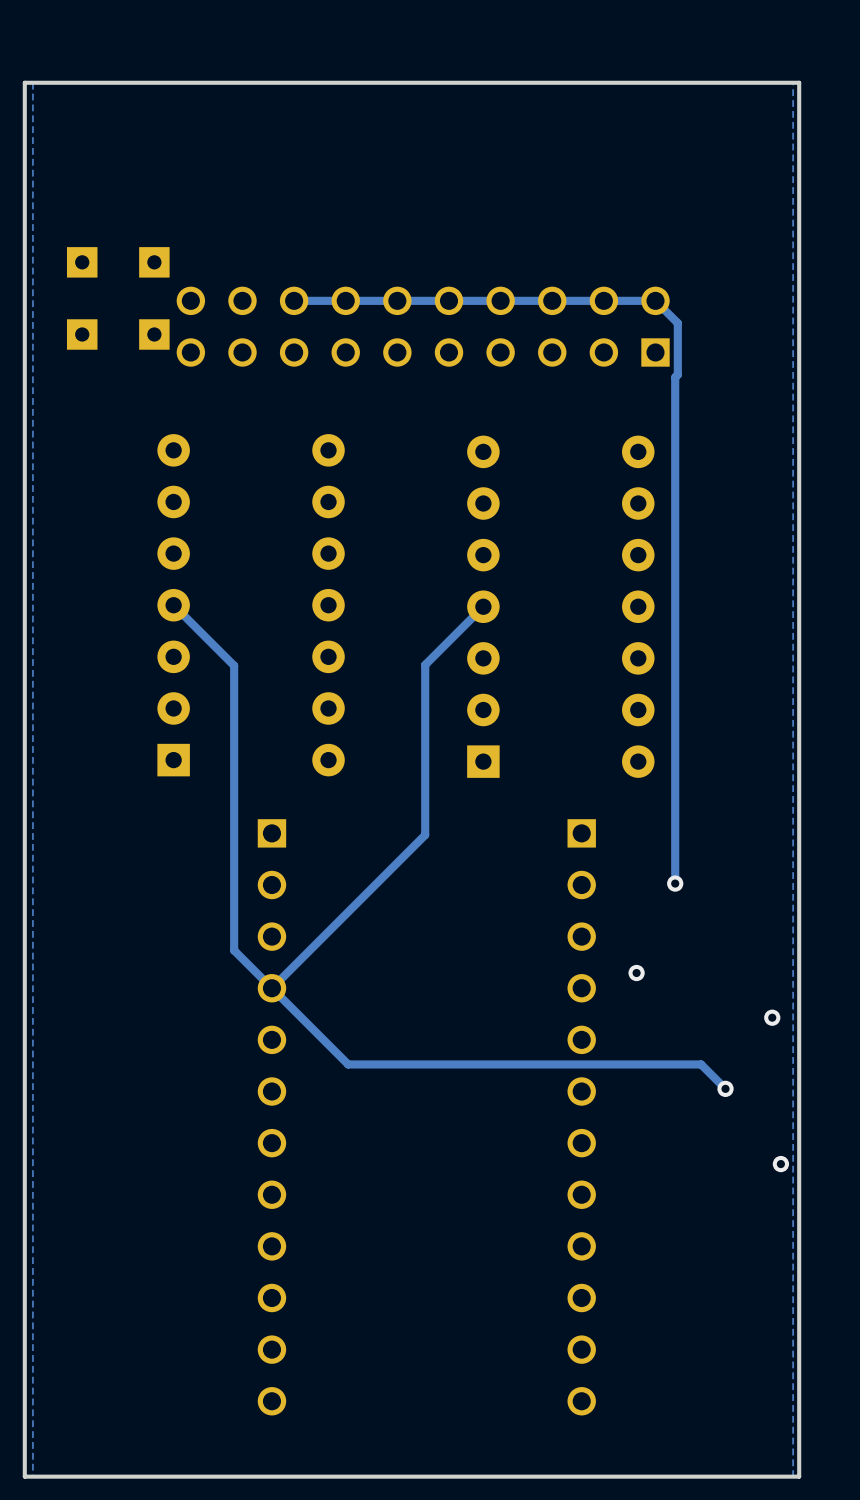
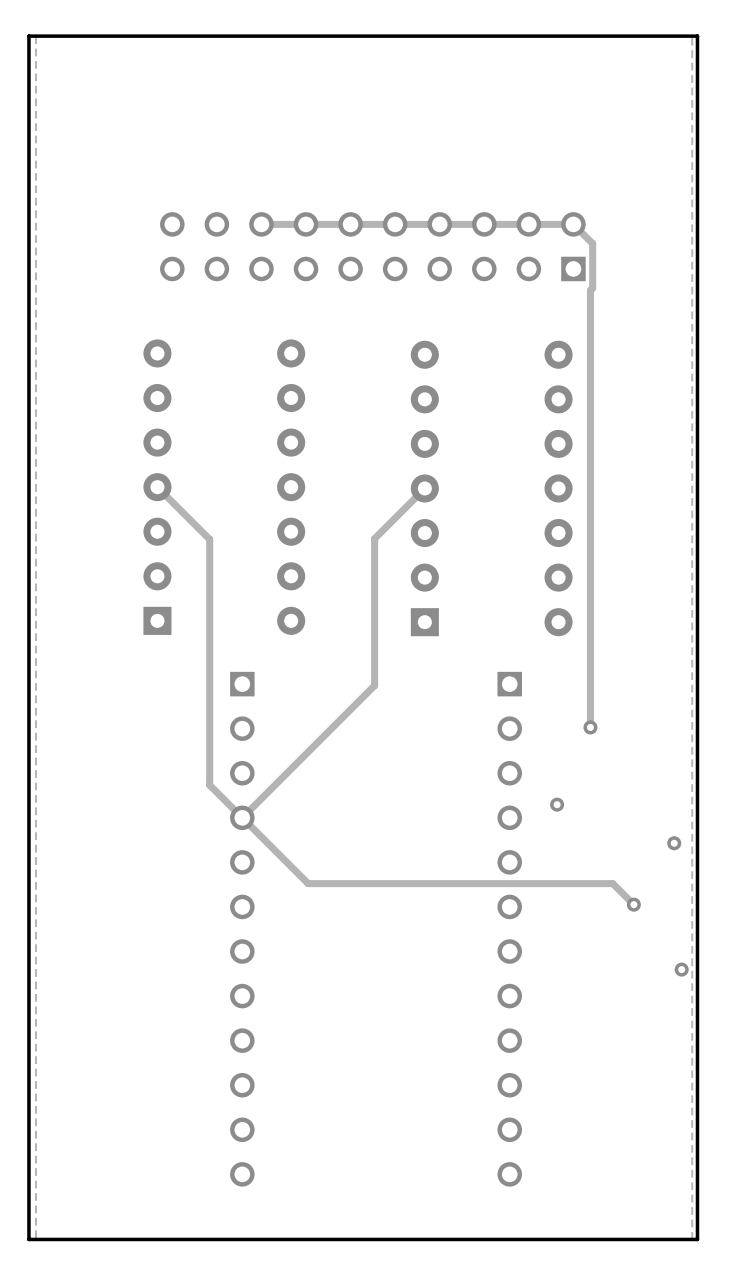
part: (82, 262) -> none
part: (154, 262) -> none
part: (82, 334) -> none
part: (154, 334) -> none

